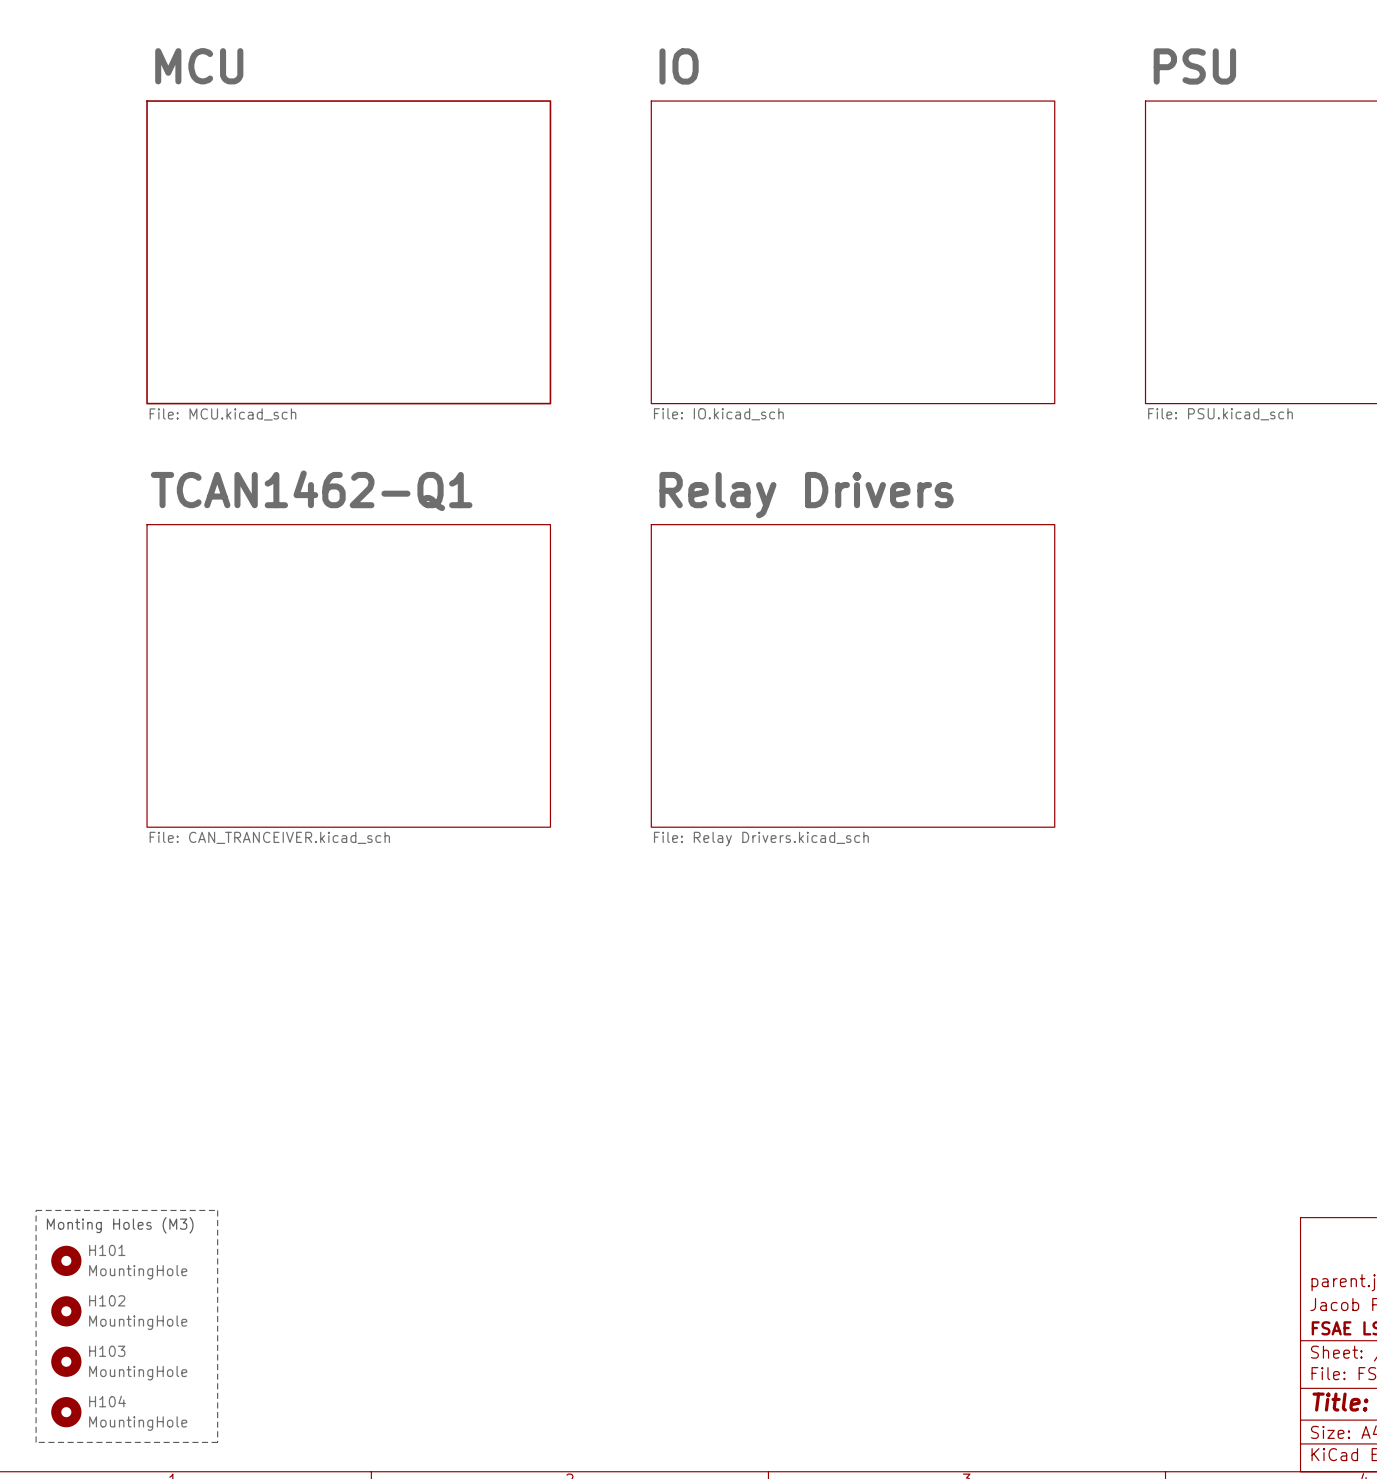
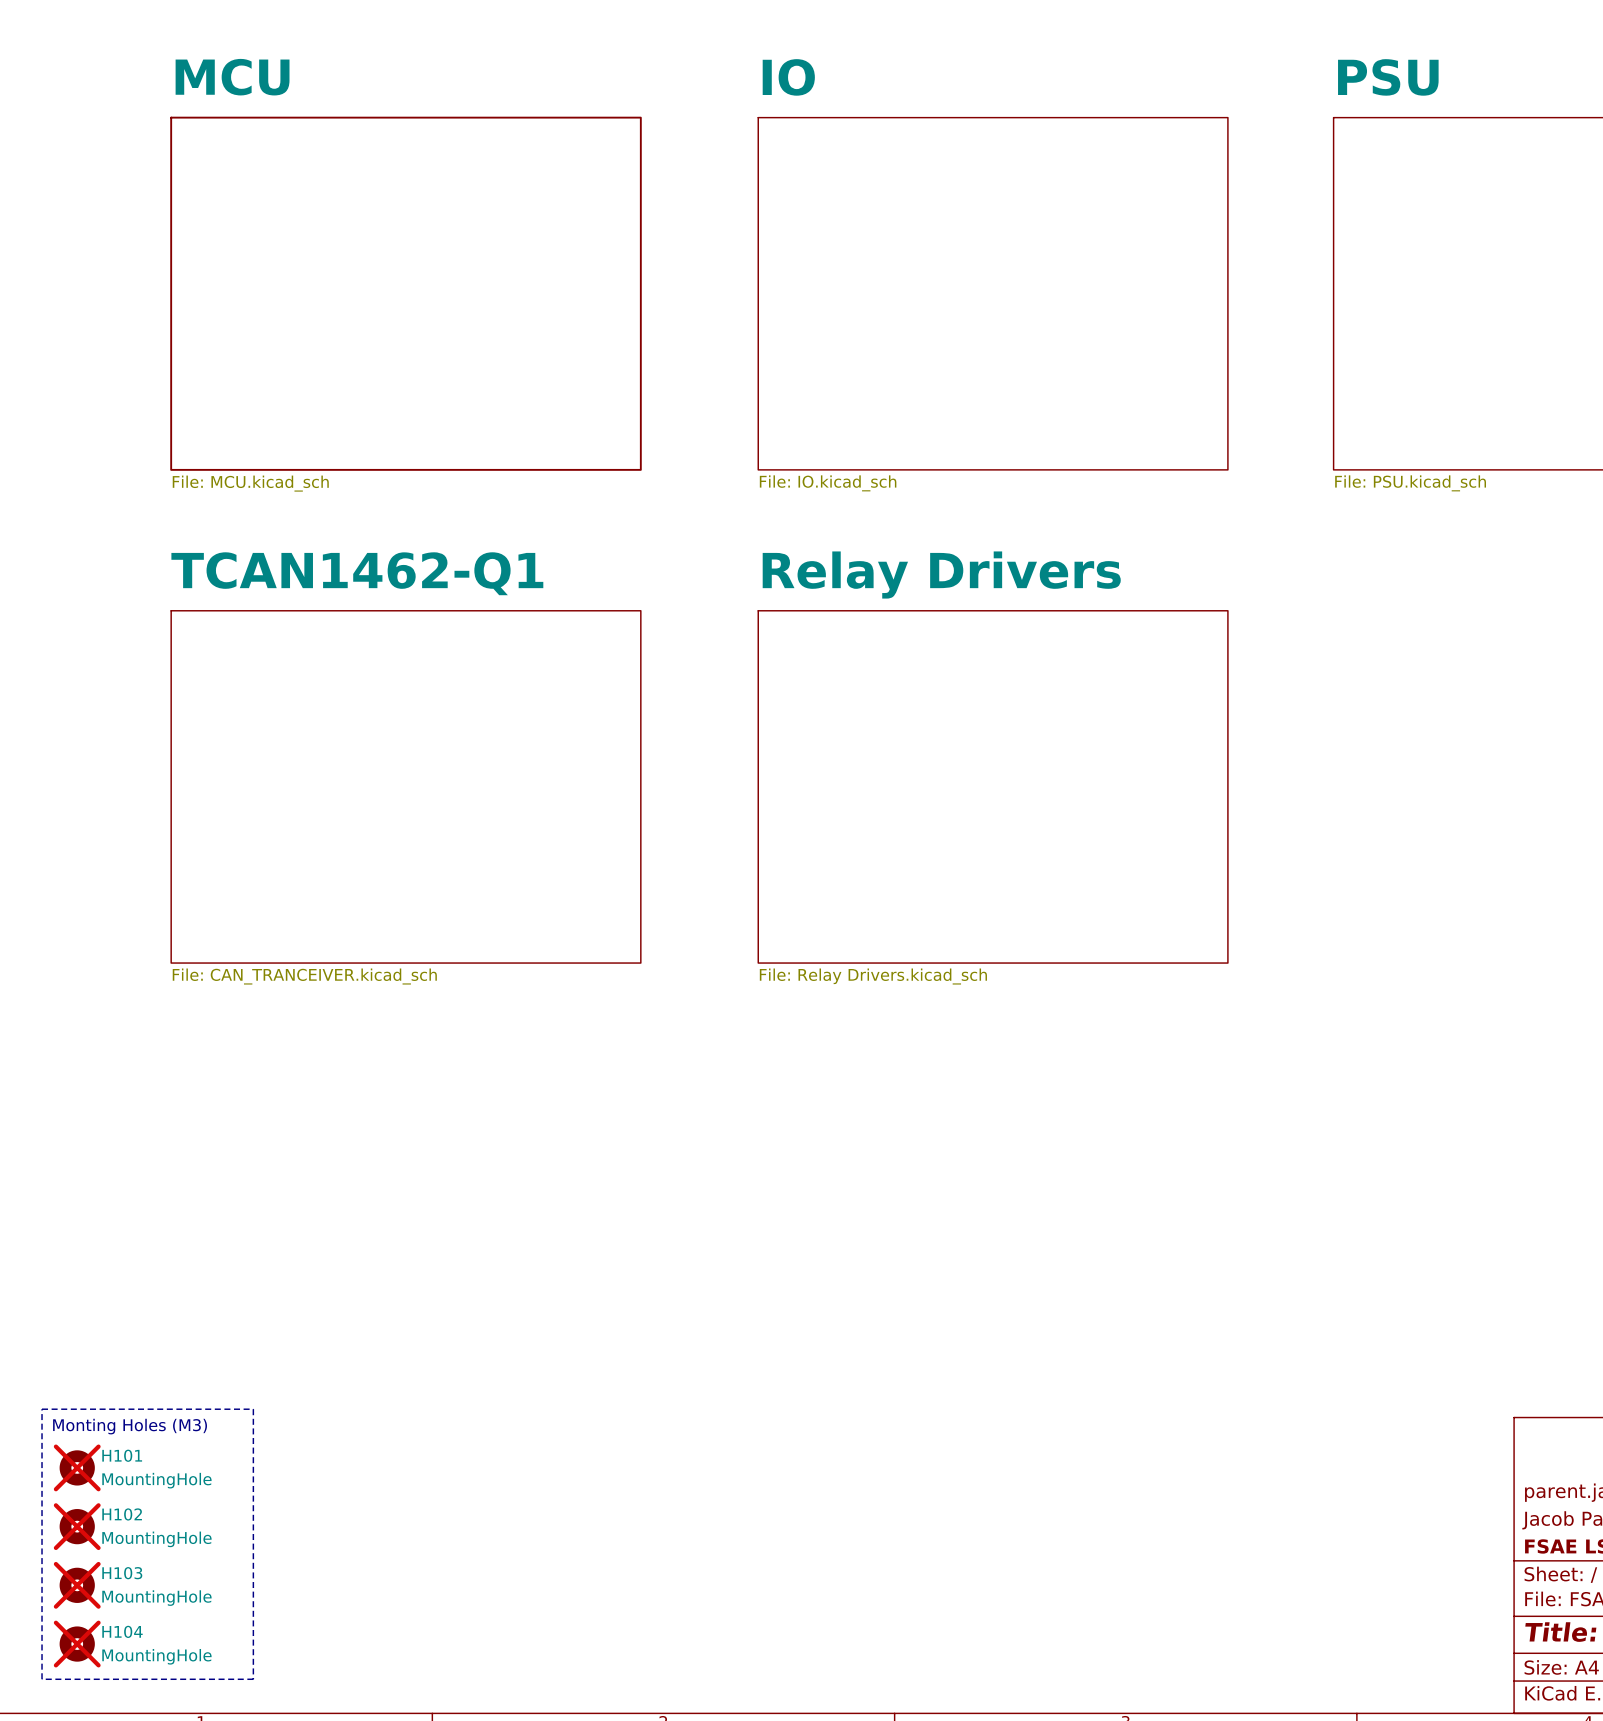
H101 do-not-place cross: none -> (77, 1467)
H102 do-not-place cross: none -> (77, 1526)
H103 do-not-place cross: none -> (77, 1585)
H104 do-not-place cross: none -> (77, 1644)

